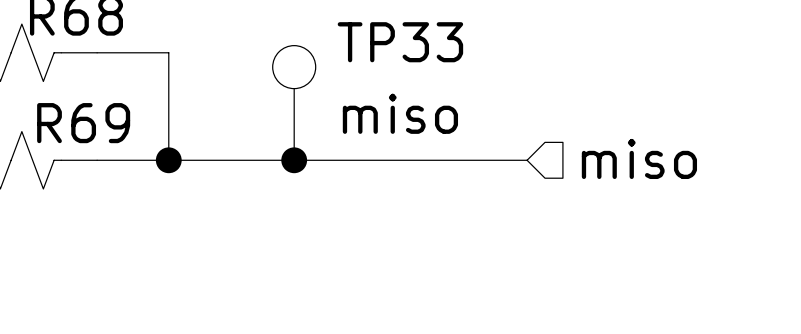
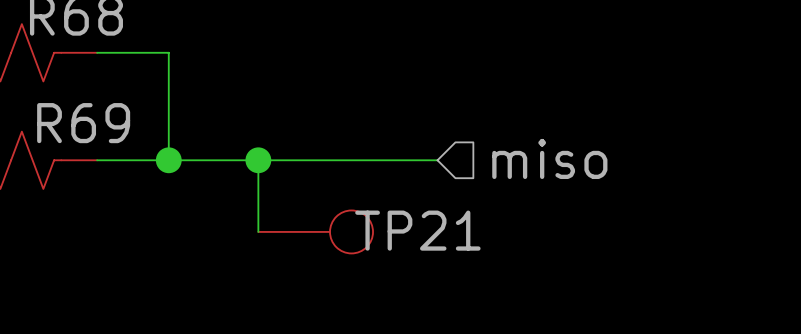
TP33: miso (294, 102) -> none
hierarchical label position: miso (639, 158) -> miso (549, 158)
wire: none -> (258, 160) (258, 231)
junction position: (294, 160) -> (258, 160)
wire: (437, 160) (527, 160) -> none
TP21: none -> (315, 231)

